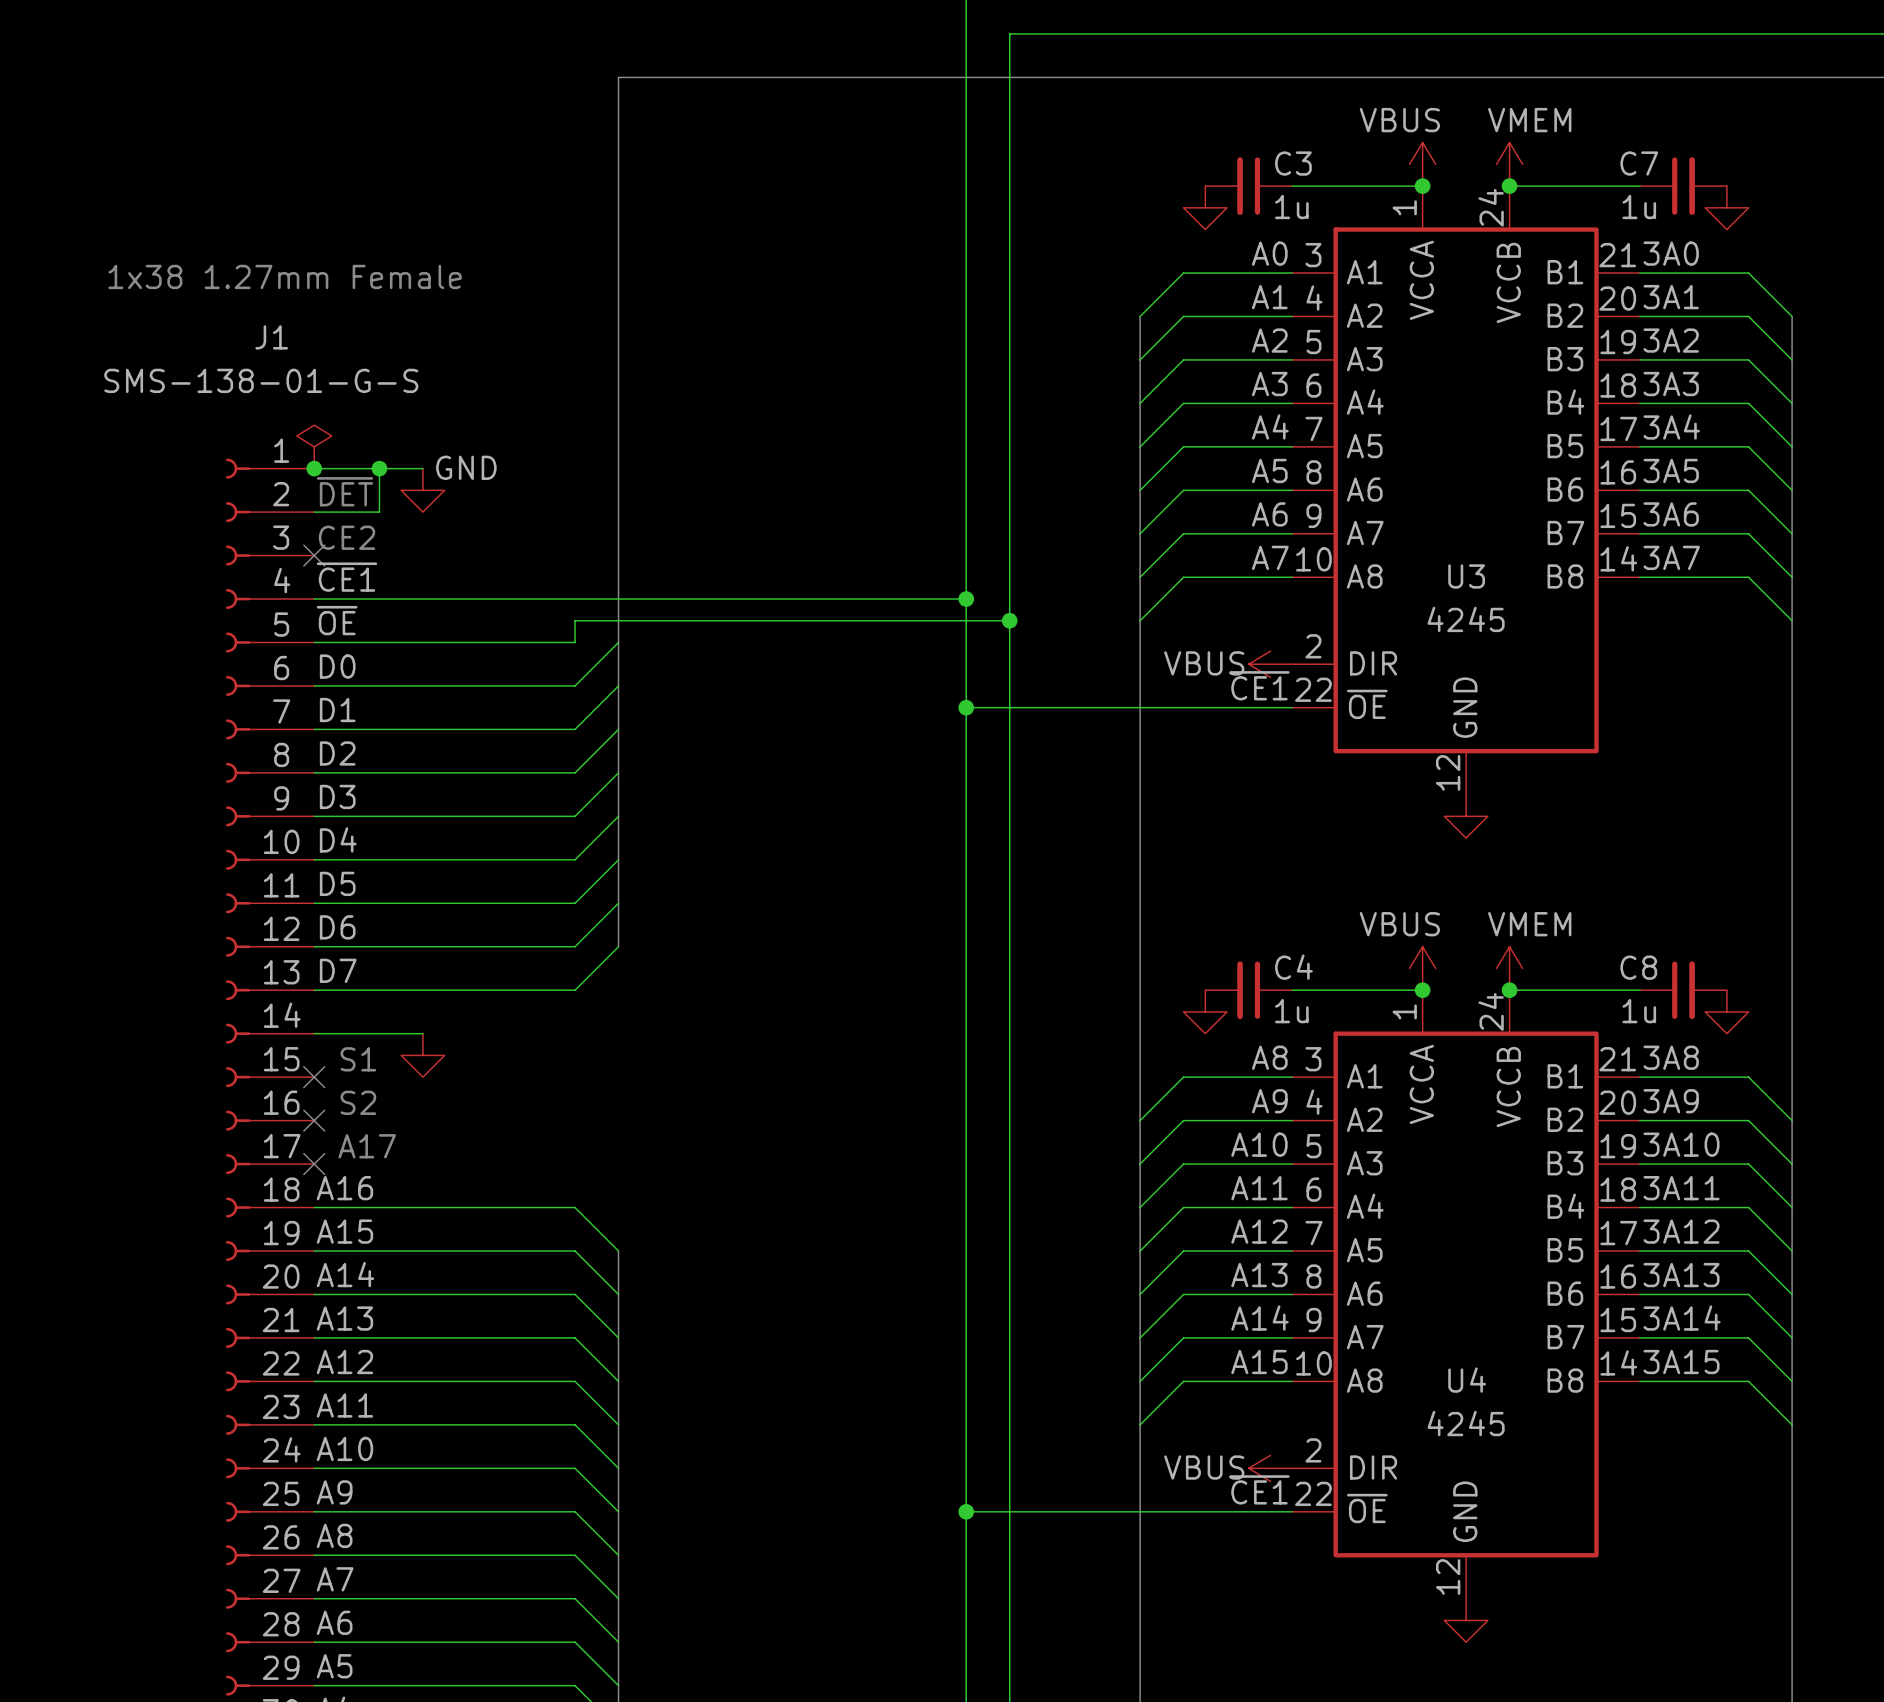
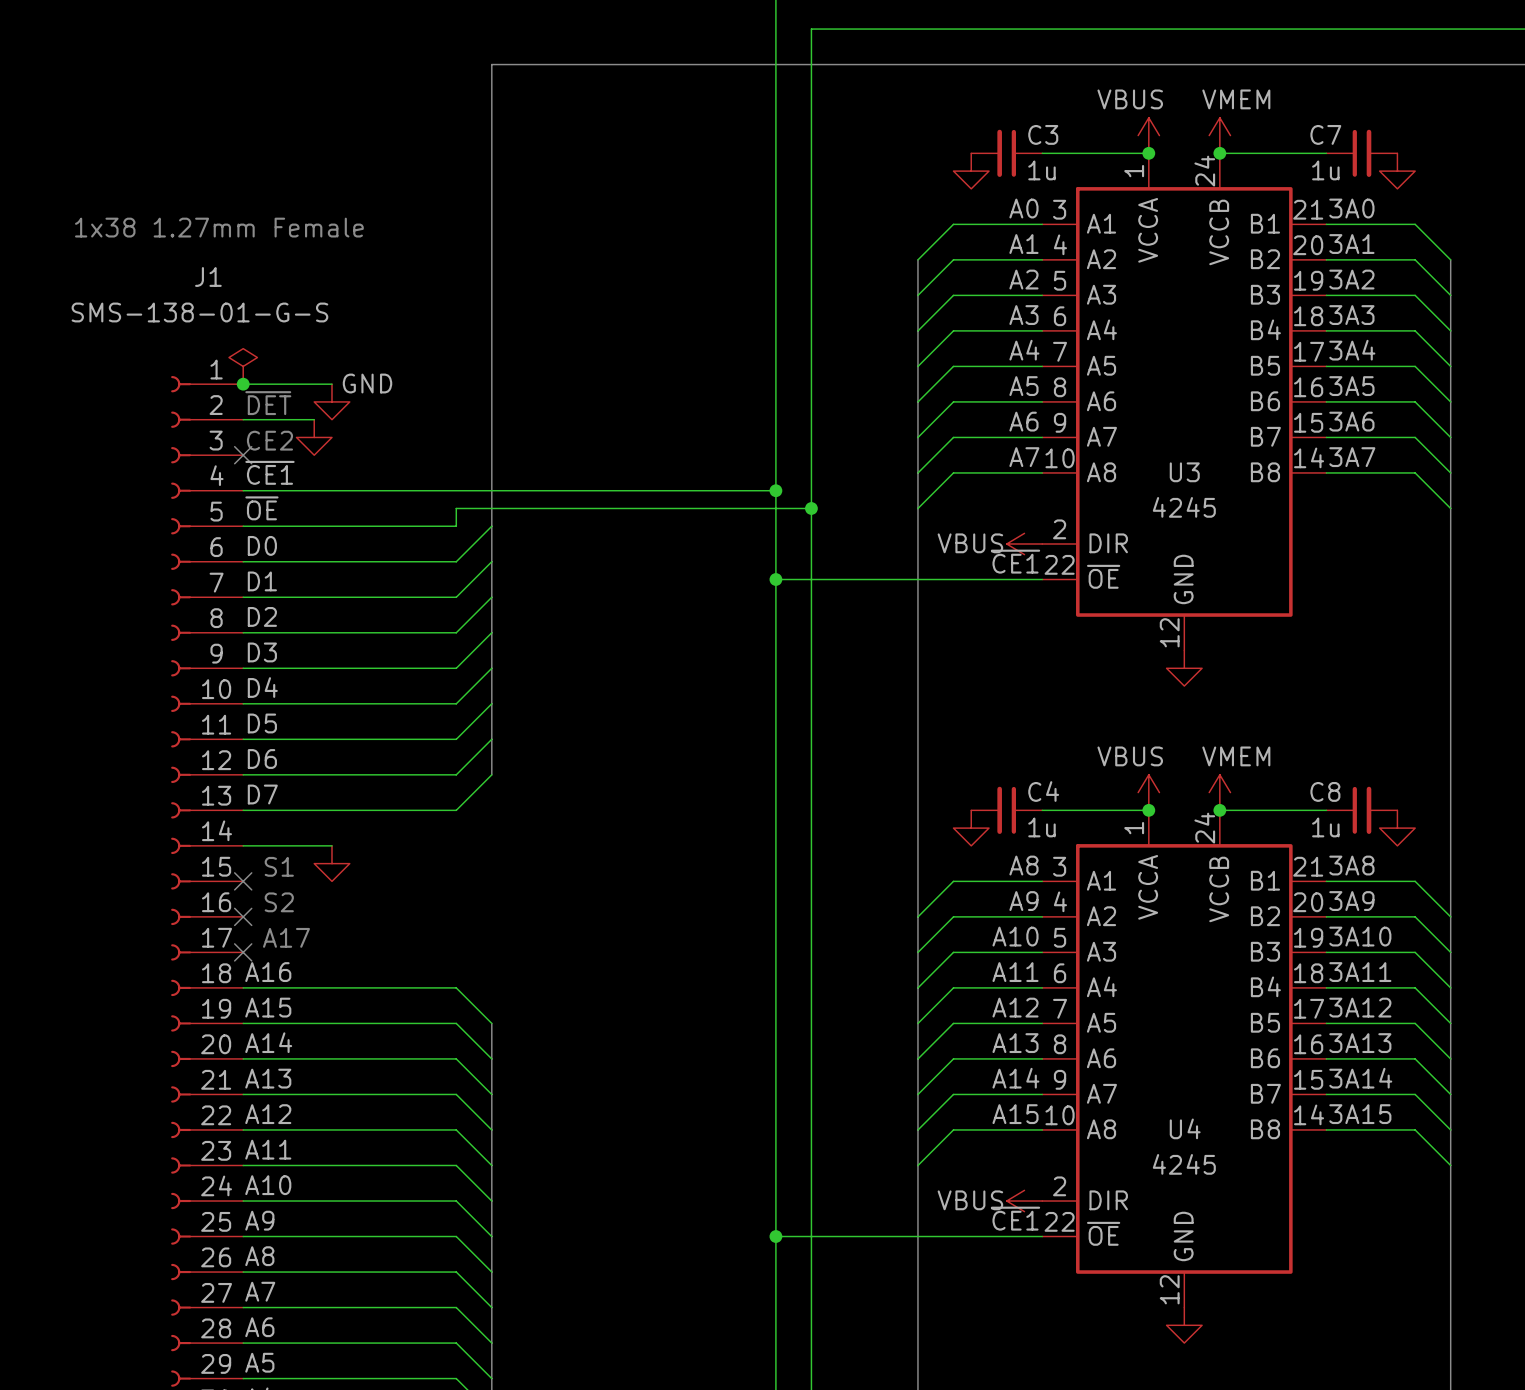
wire: (379, 468) (379, 512) -> (314, 419) (296, 419)
junction: (379, 468) -> none
power symbol: none -> (314, 437)

